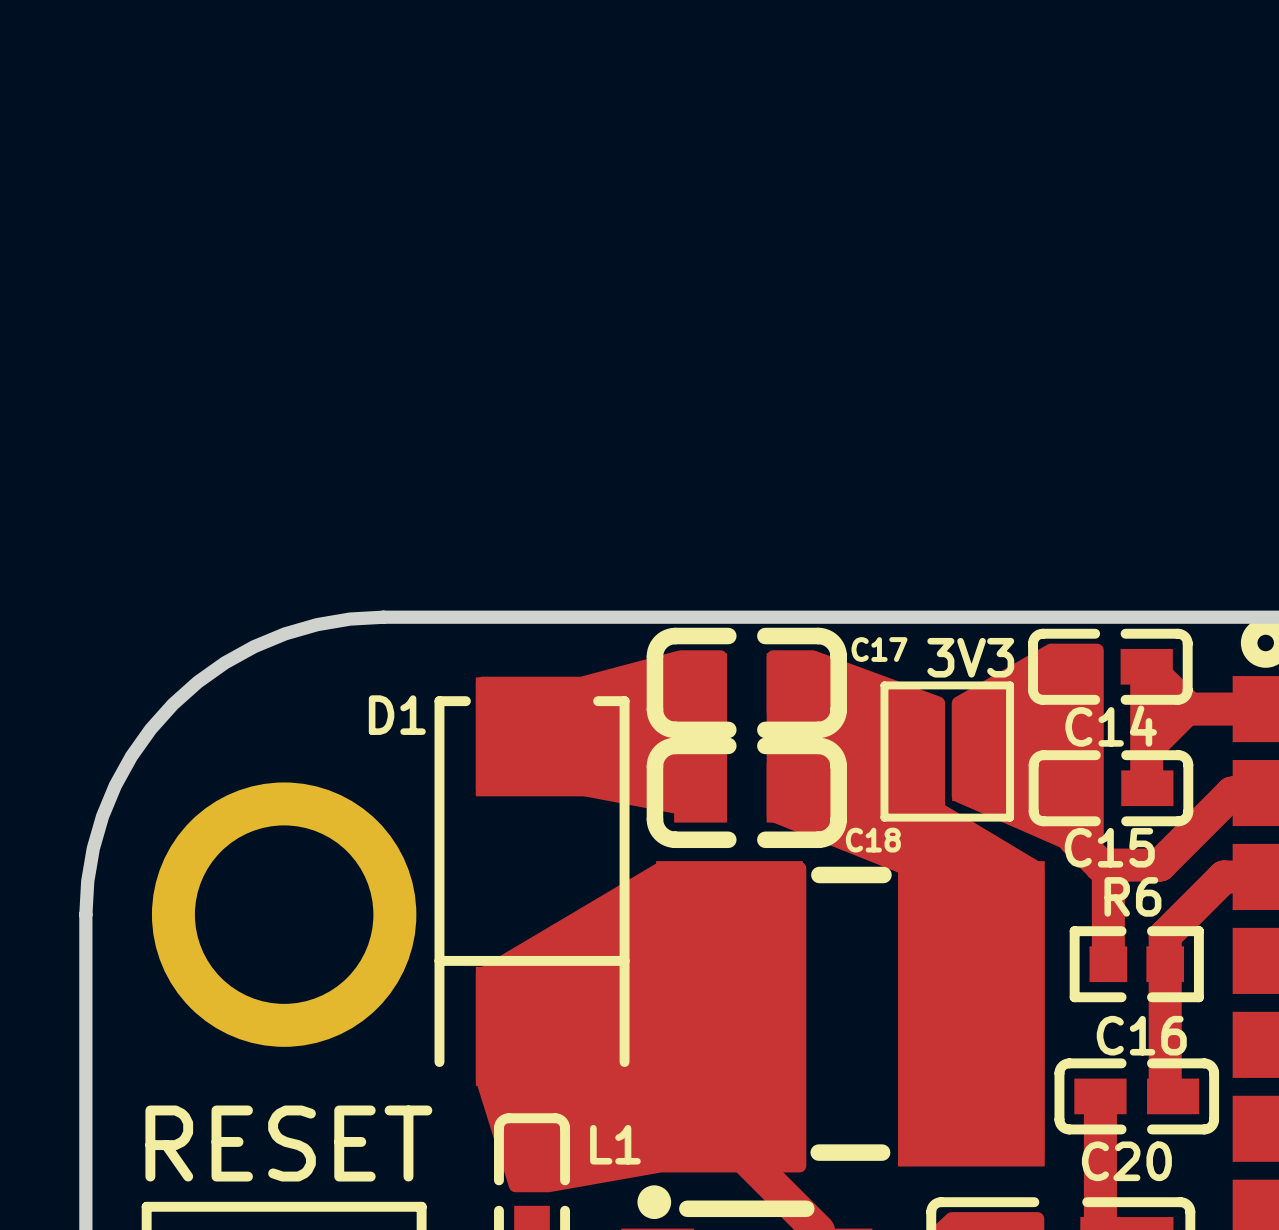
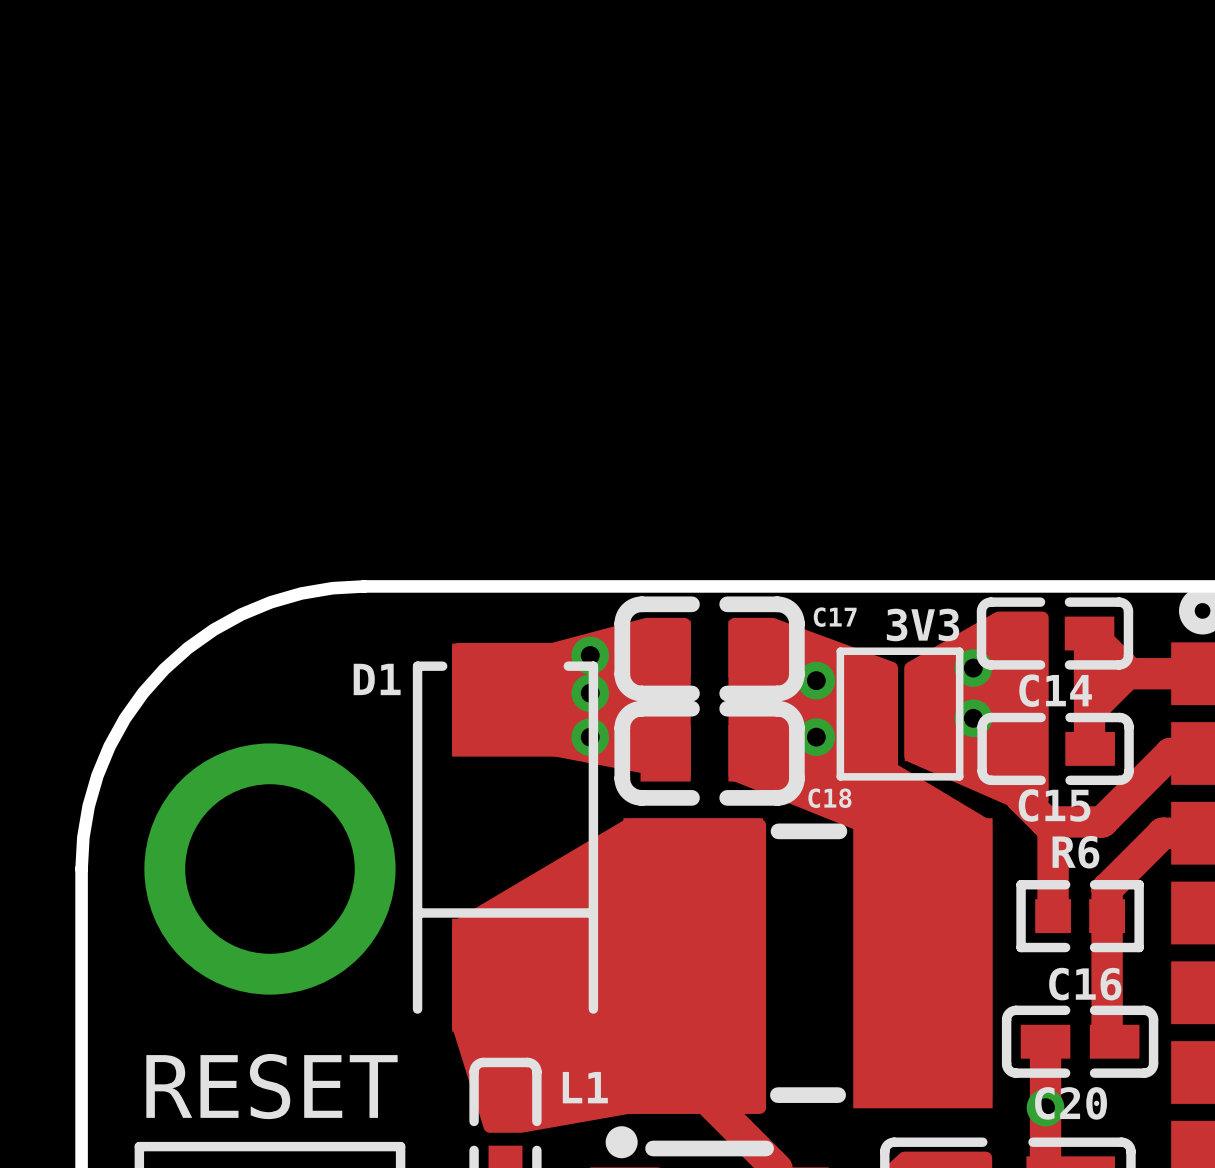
via: none -> (590, 655)
via: none -> (973, 668)
via: none -> (816, 680)
via: none -> (590, 693)
via: none -> (973, 718)
via: none -> (590, 737)
via: none -> (816, 737)
via: none -> (1045, 1107)

